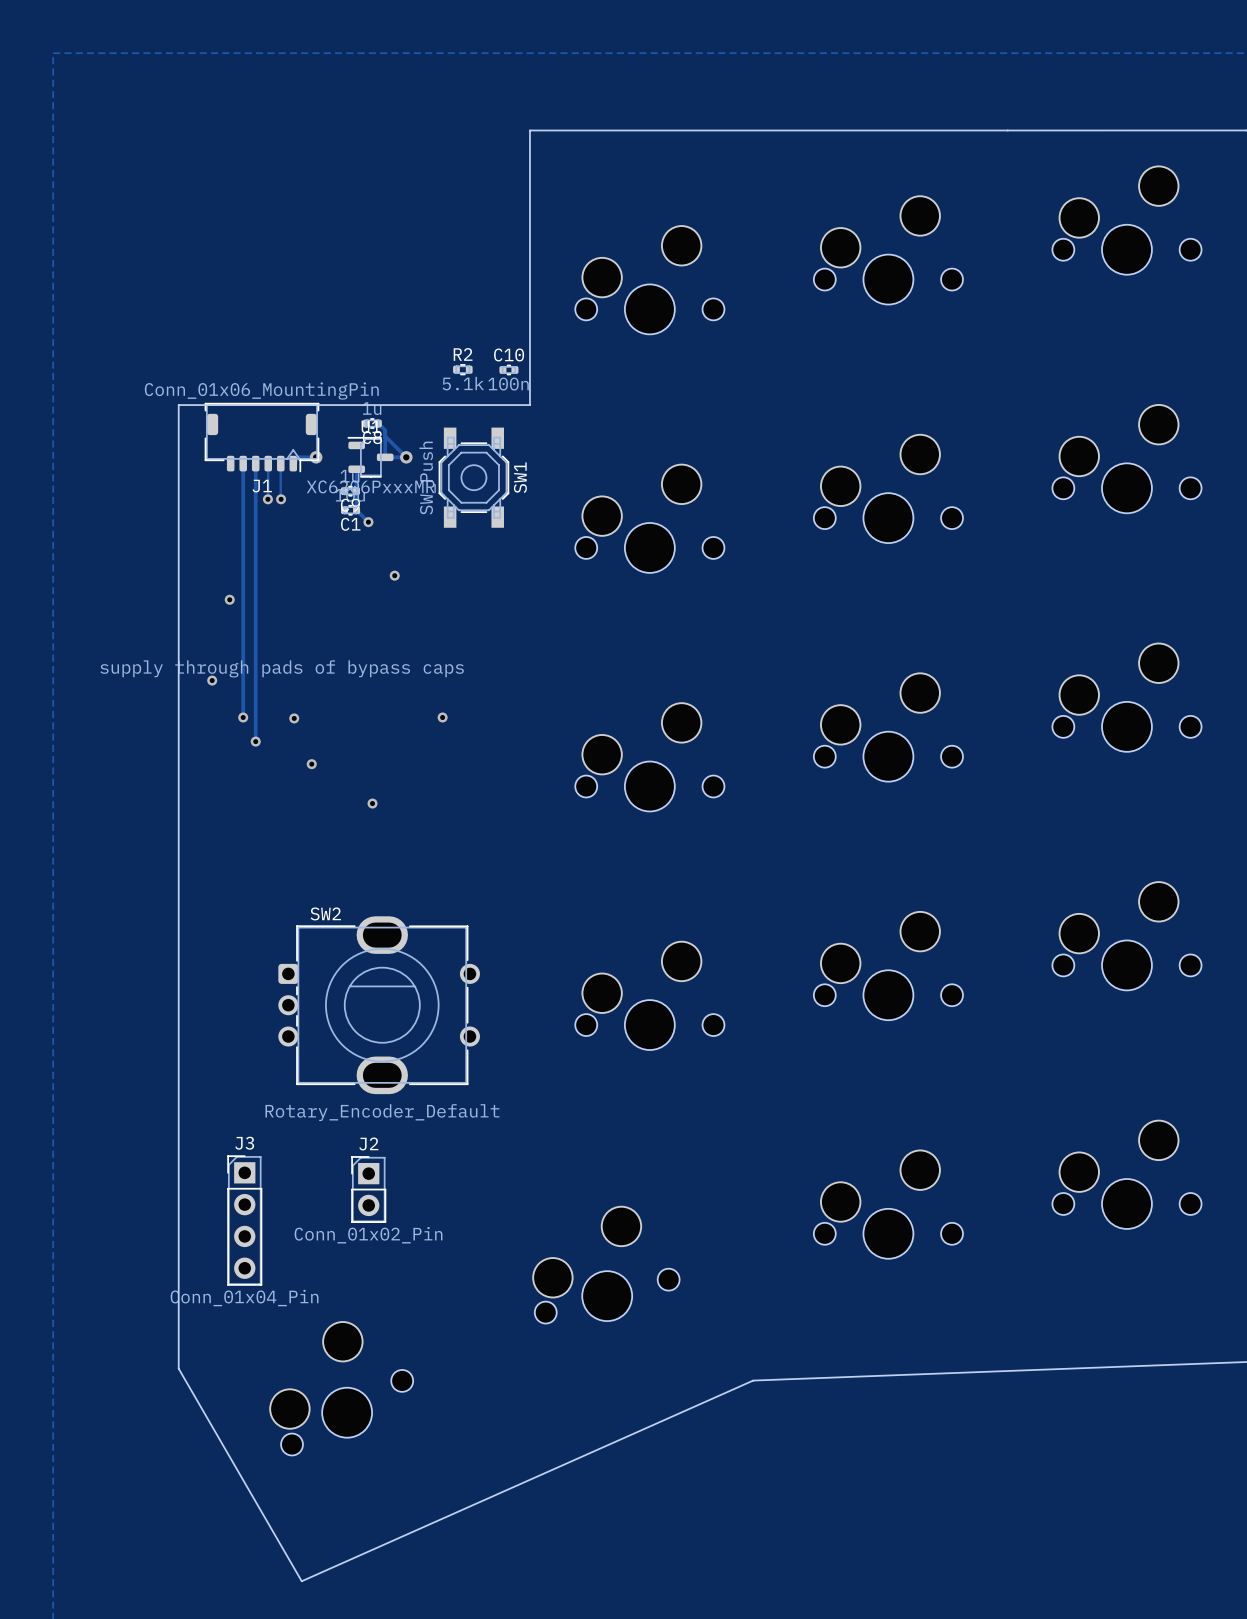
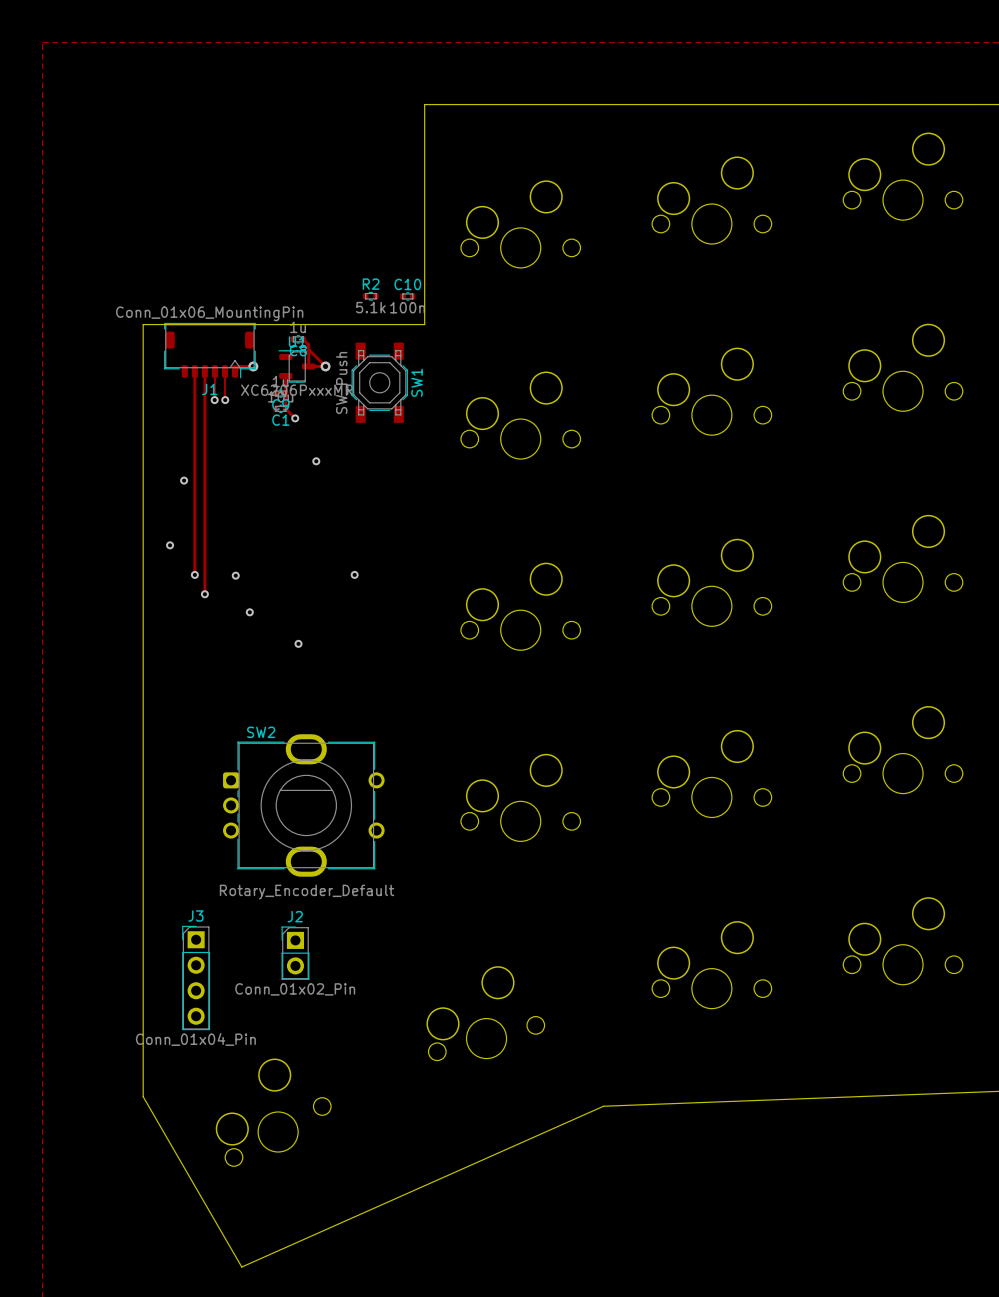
text: supply through pads of bypass caps (282, 668) -> none

